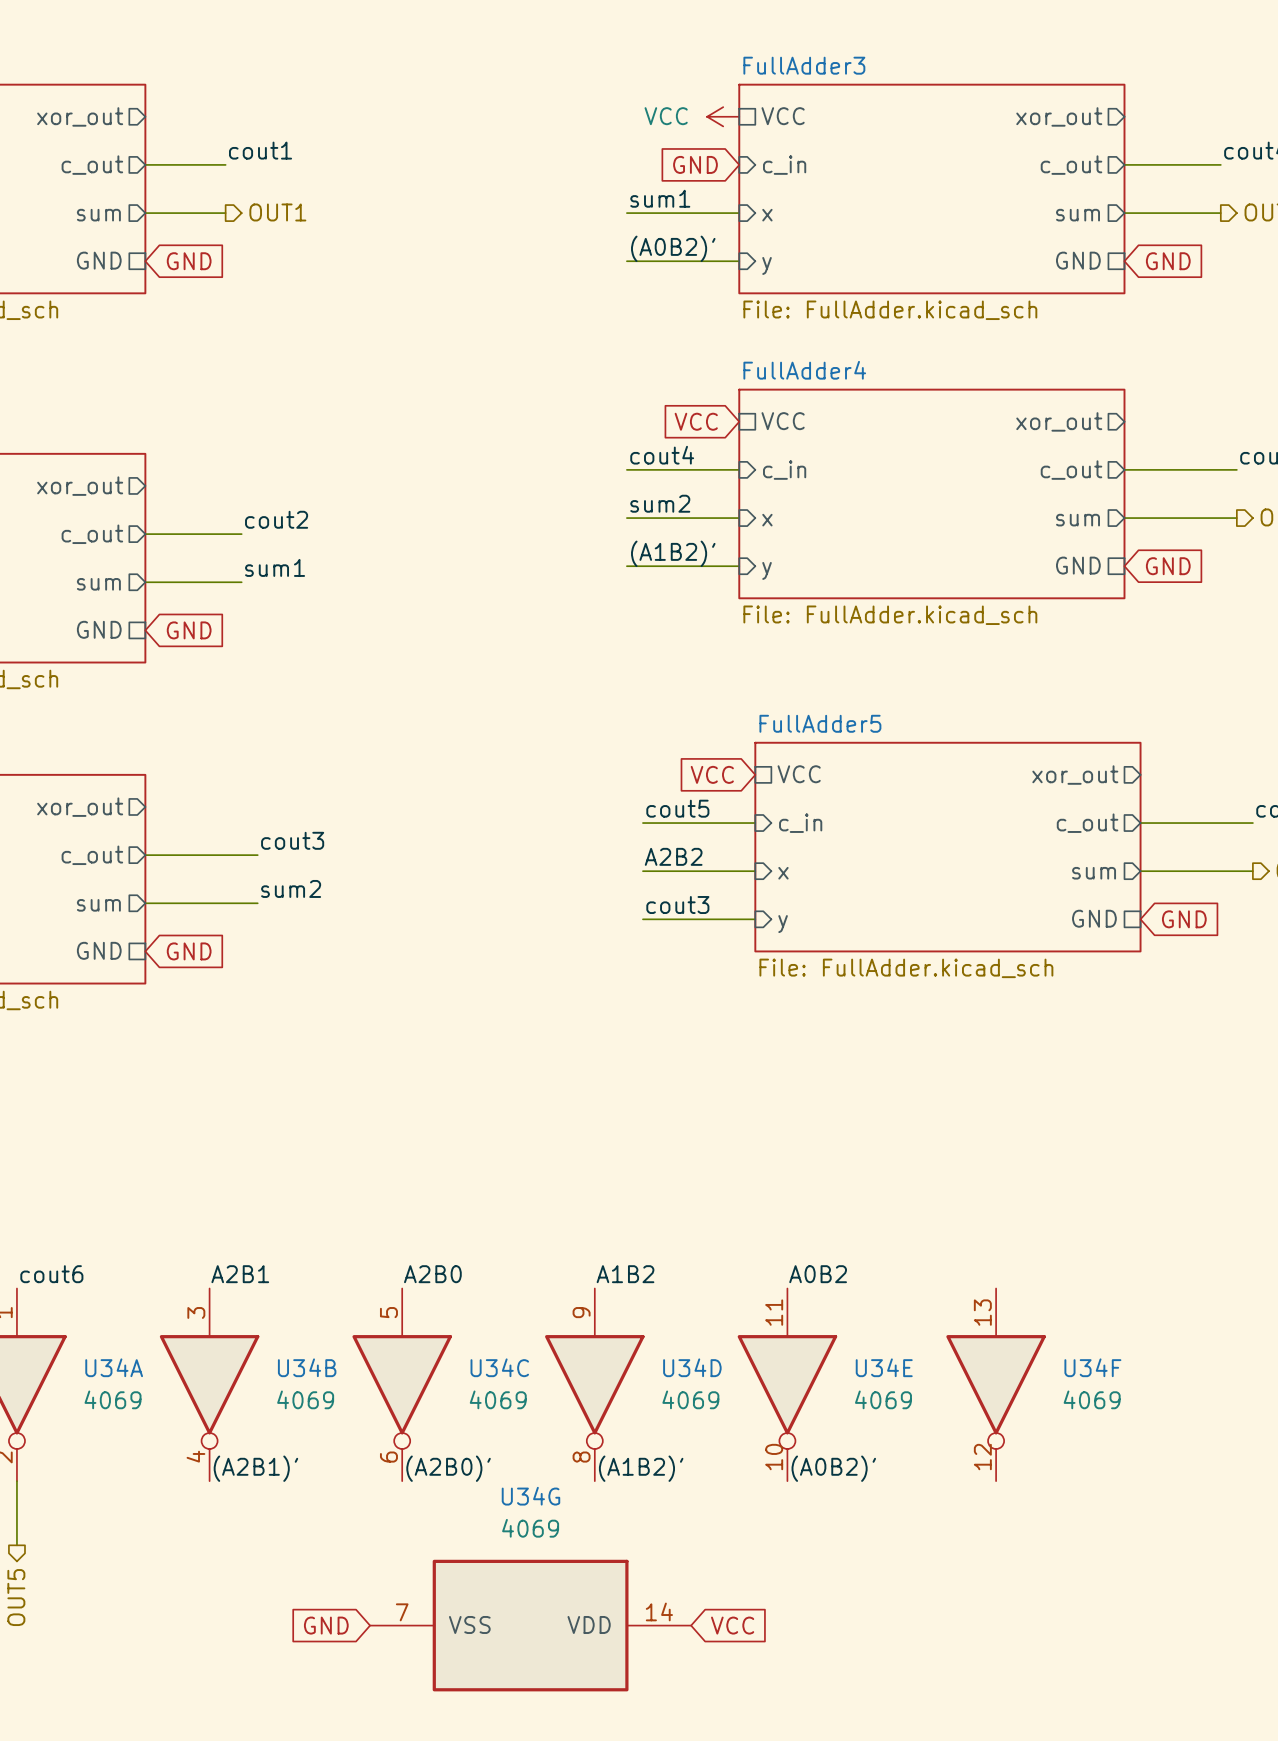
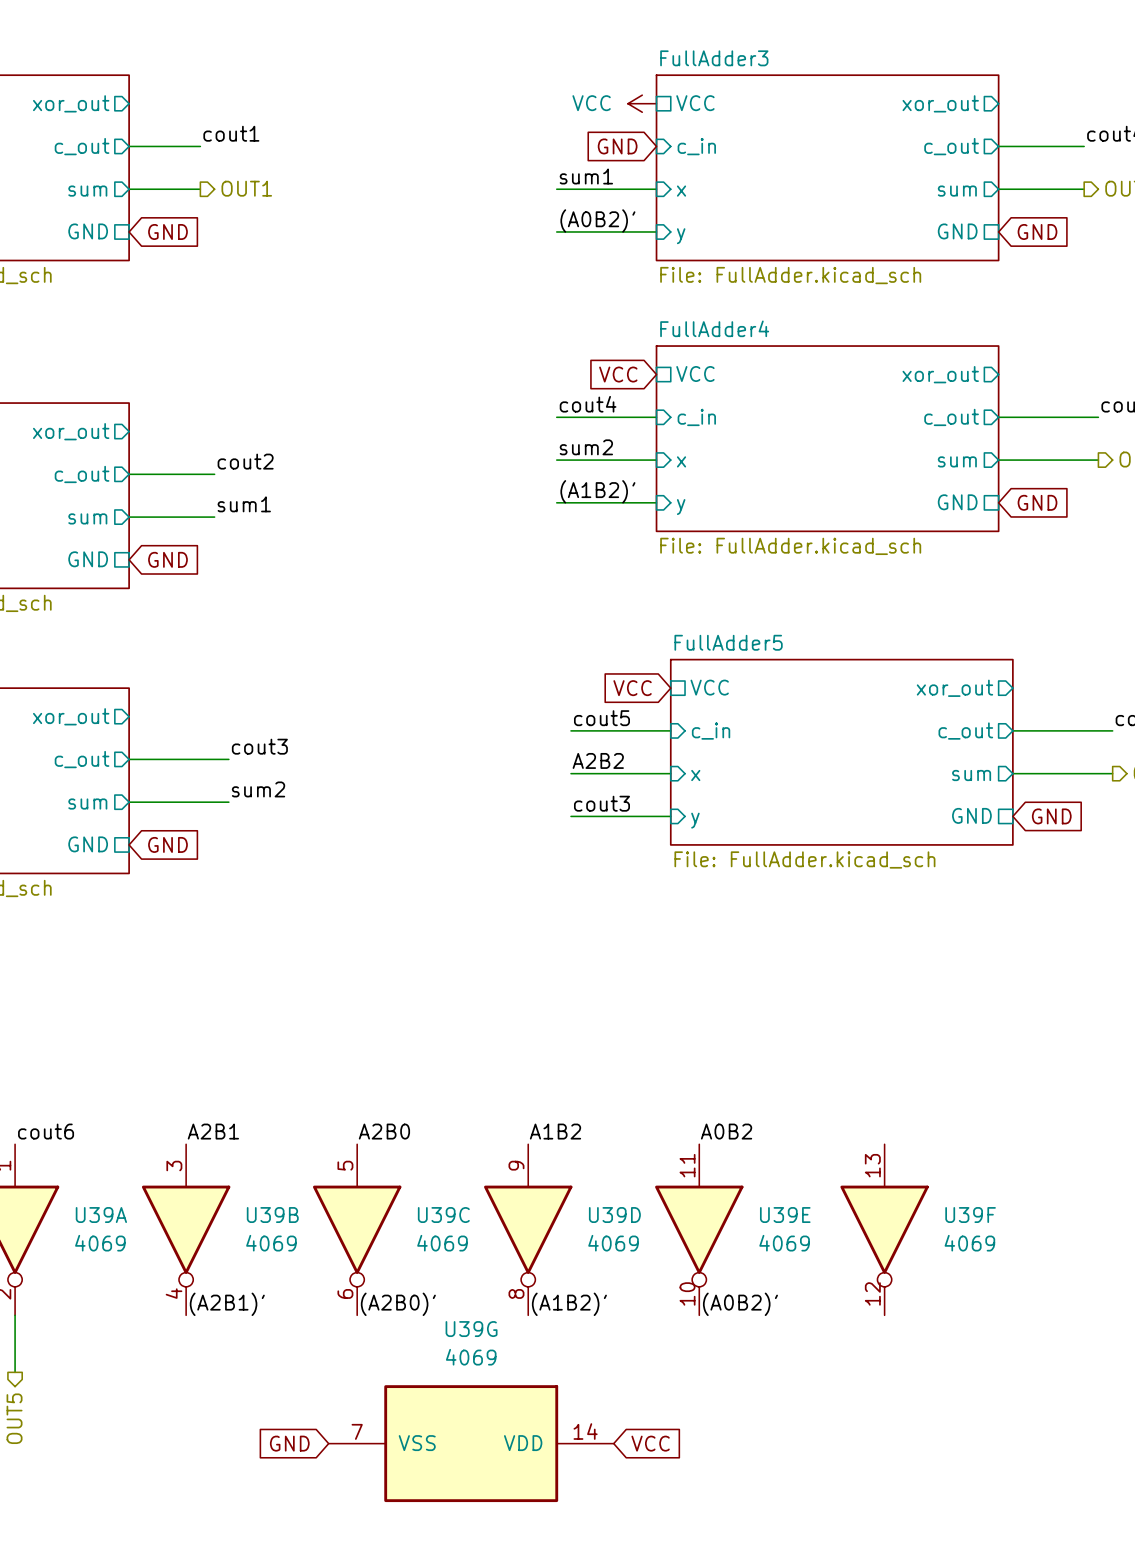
U34A name: U34A (114, 1367) -> U39A (101, 1215)
U34B name: U34B (307, 1367) -> U39B (272, 1215)
U34C name: U34C (499, 1367) -> U39C (443, 1215)
U34D name: U34D (692, 1367) -> U39D (614, 1215)
U34E name: U34E (884, 1367) -> U39E (785, 1215)
U34F name: U34F (1092, 1367) -> U39F (970, 1215)
U34G name: U34G (530, 1496) -> U39G (471, 1329)

